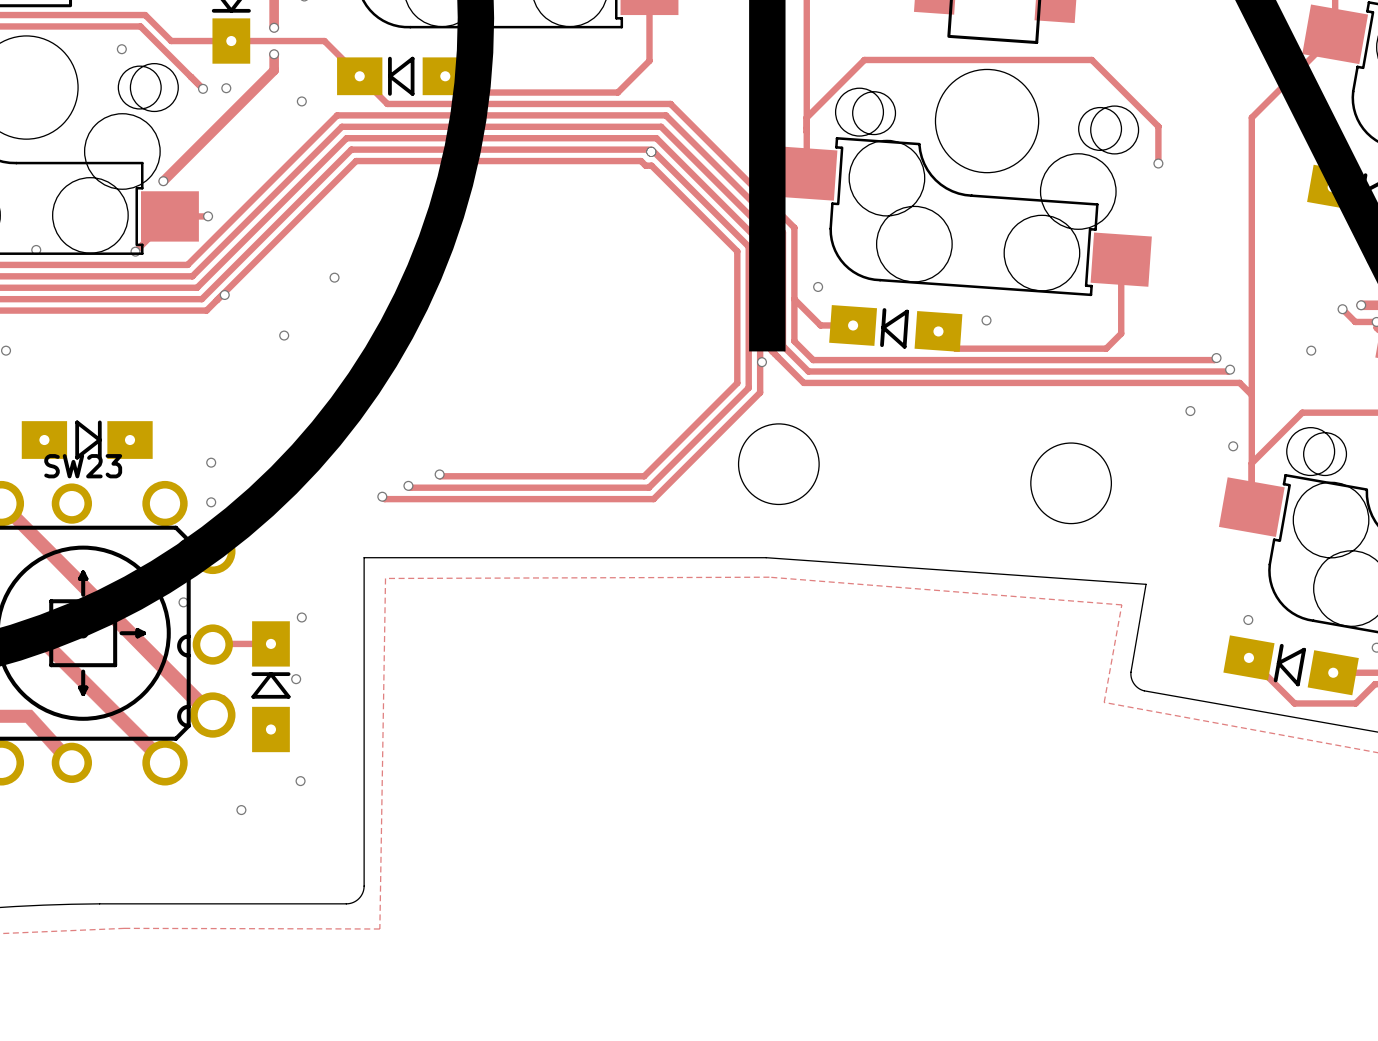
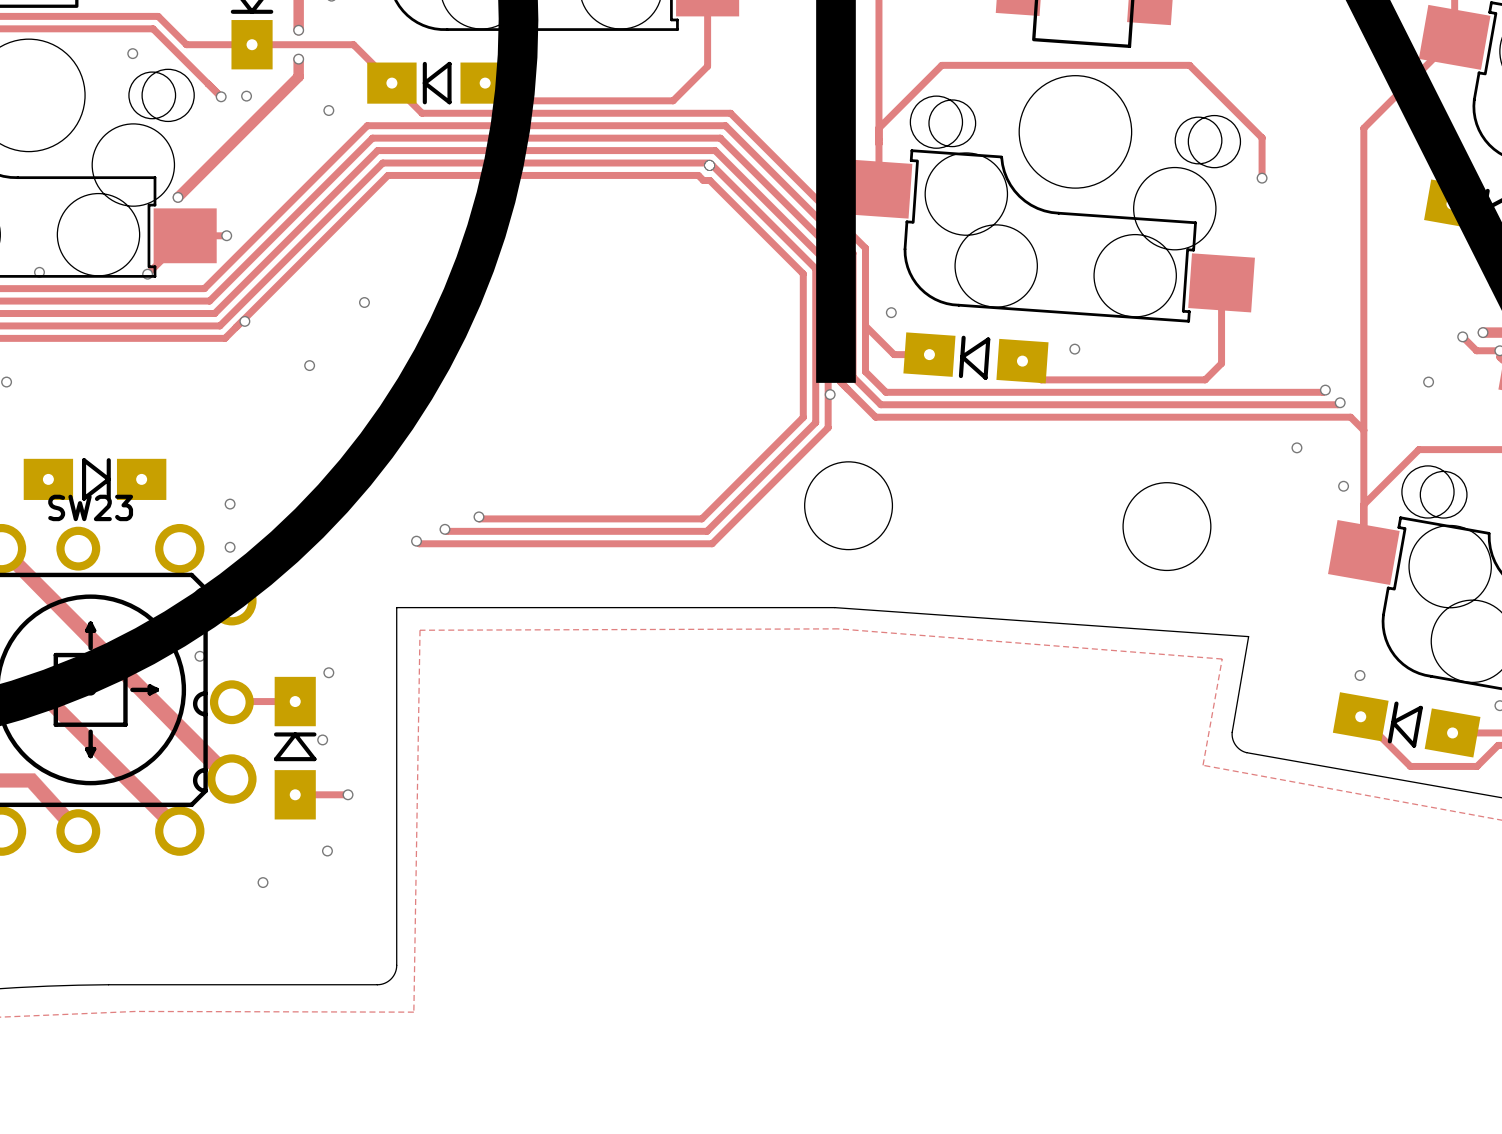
track: none -> (295, 794) (348, 794)
via: none -> (348, 794)

